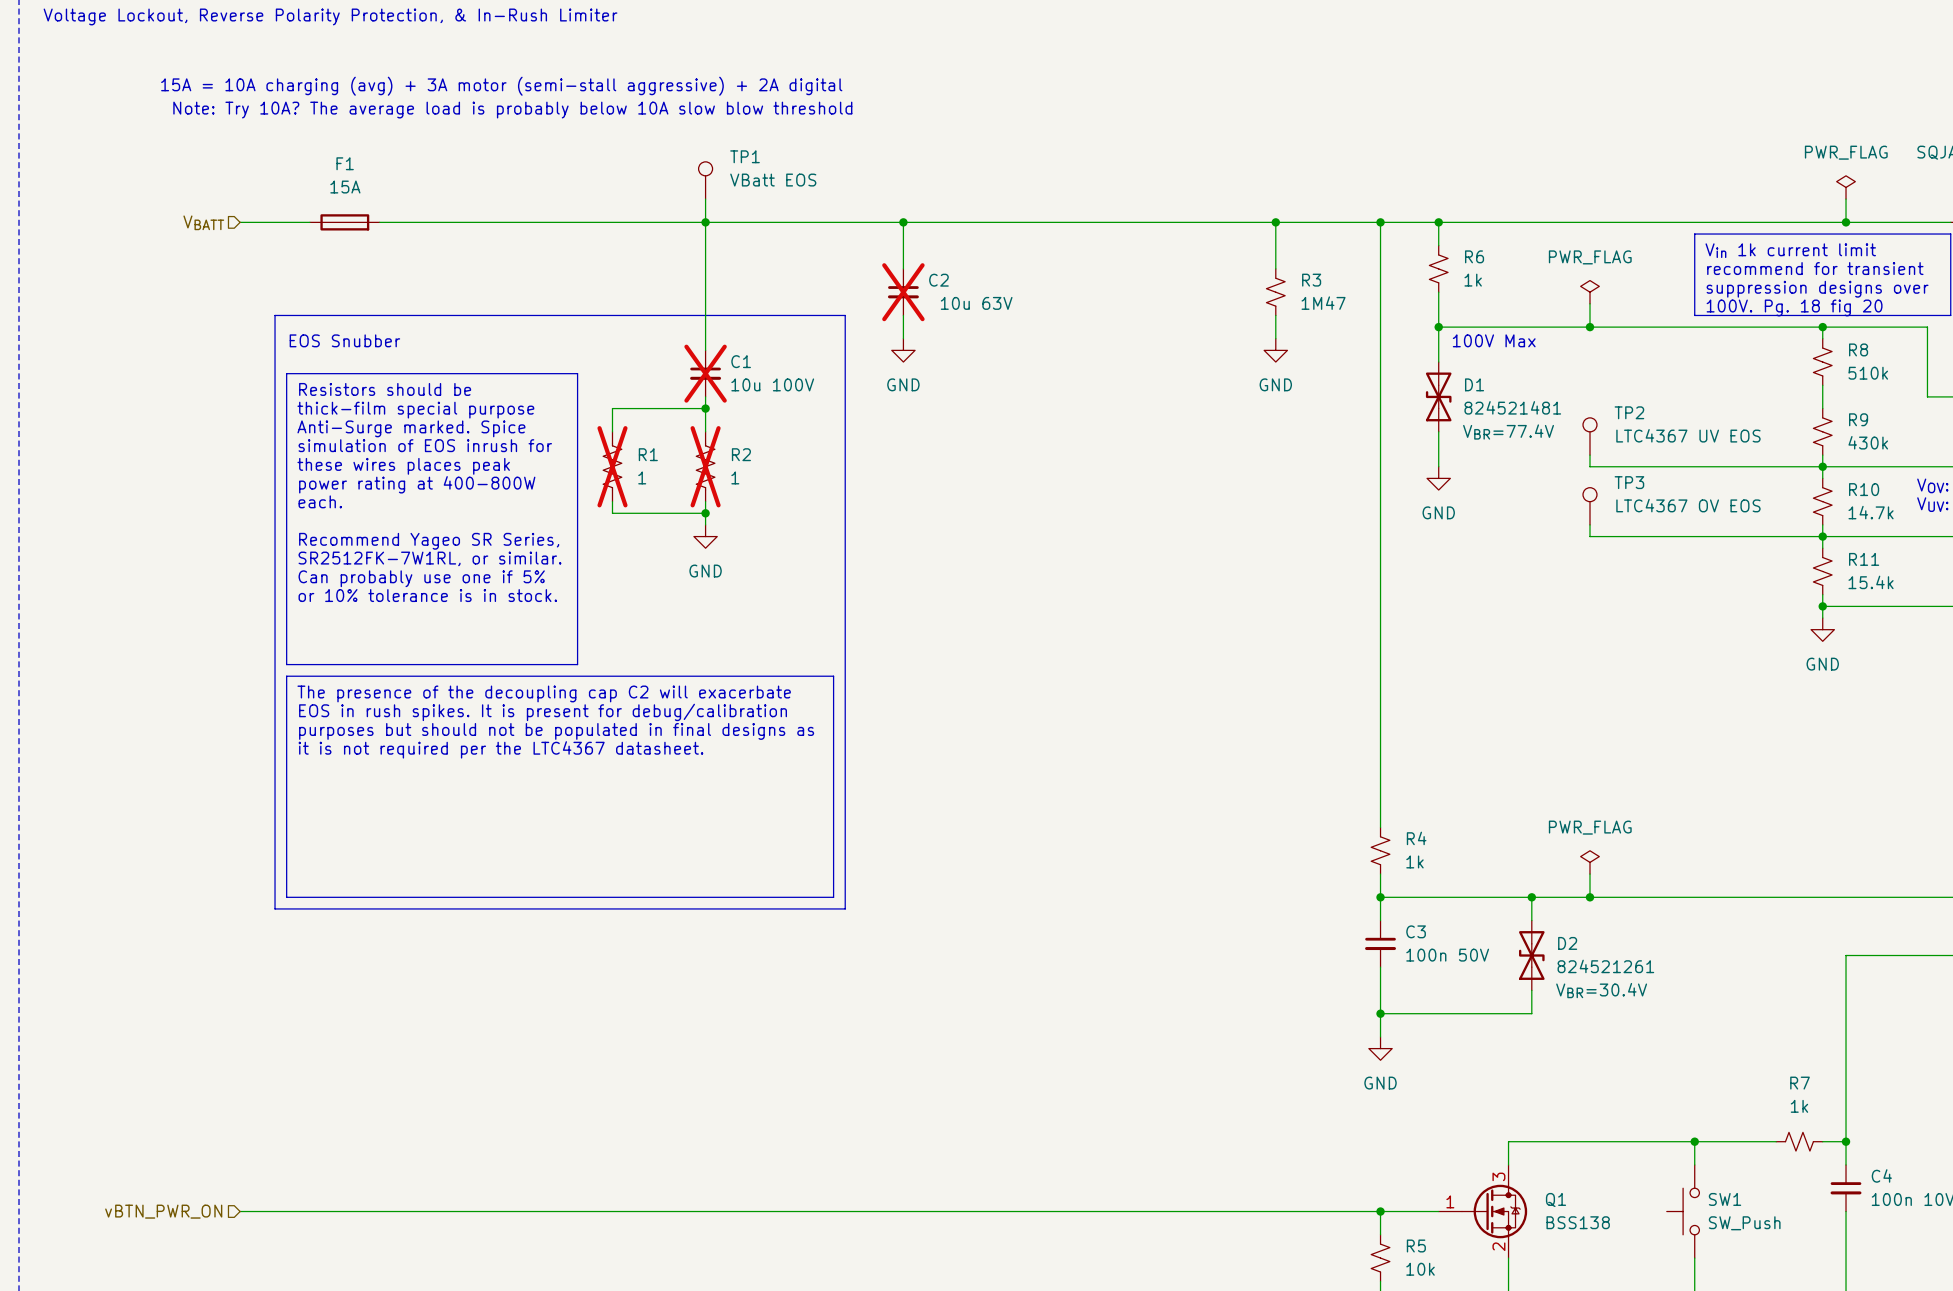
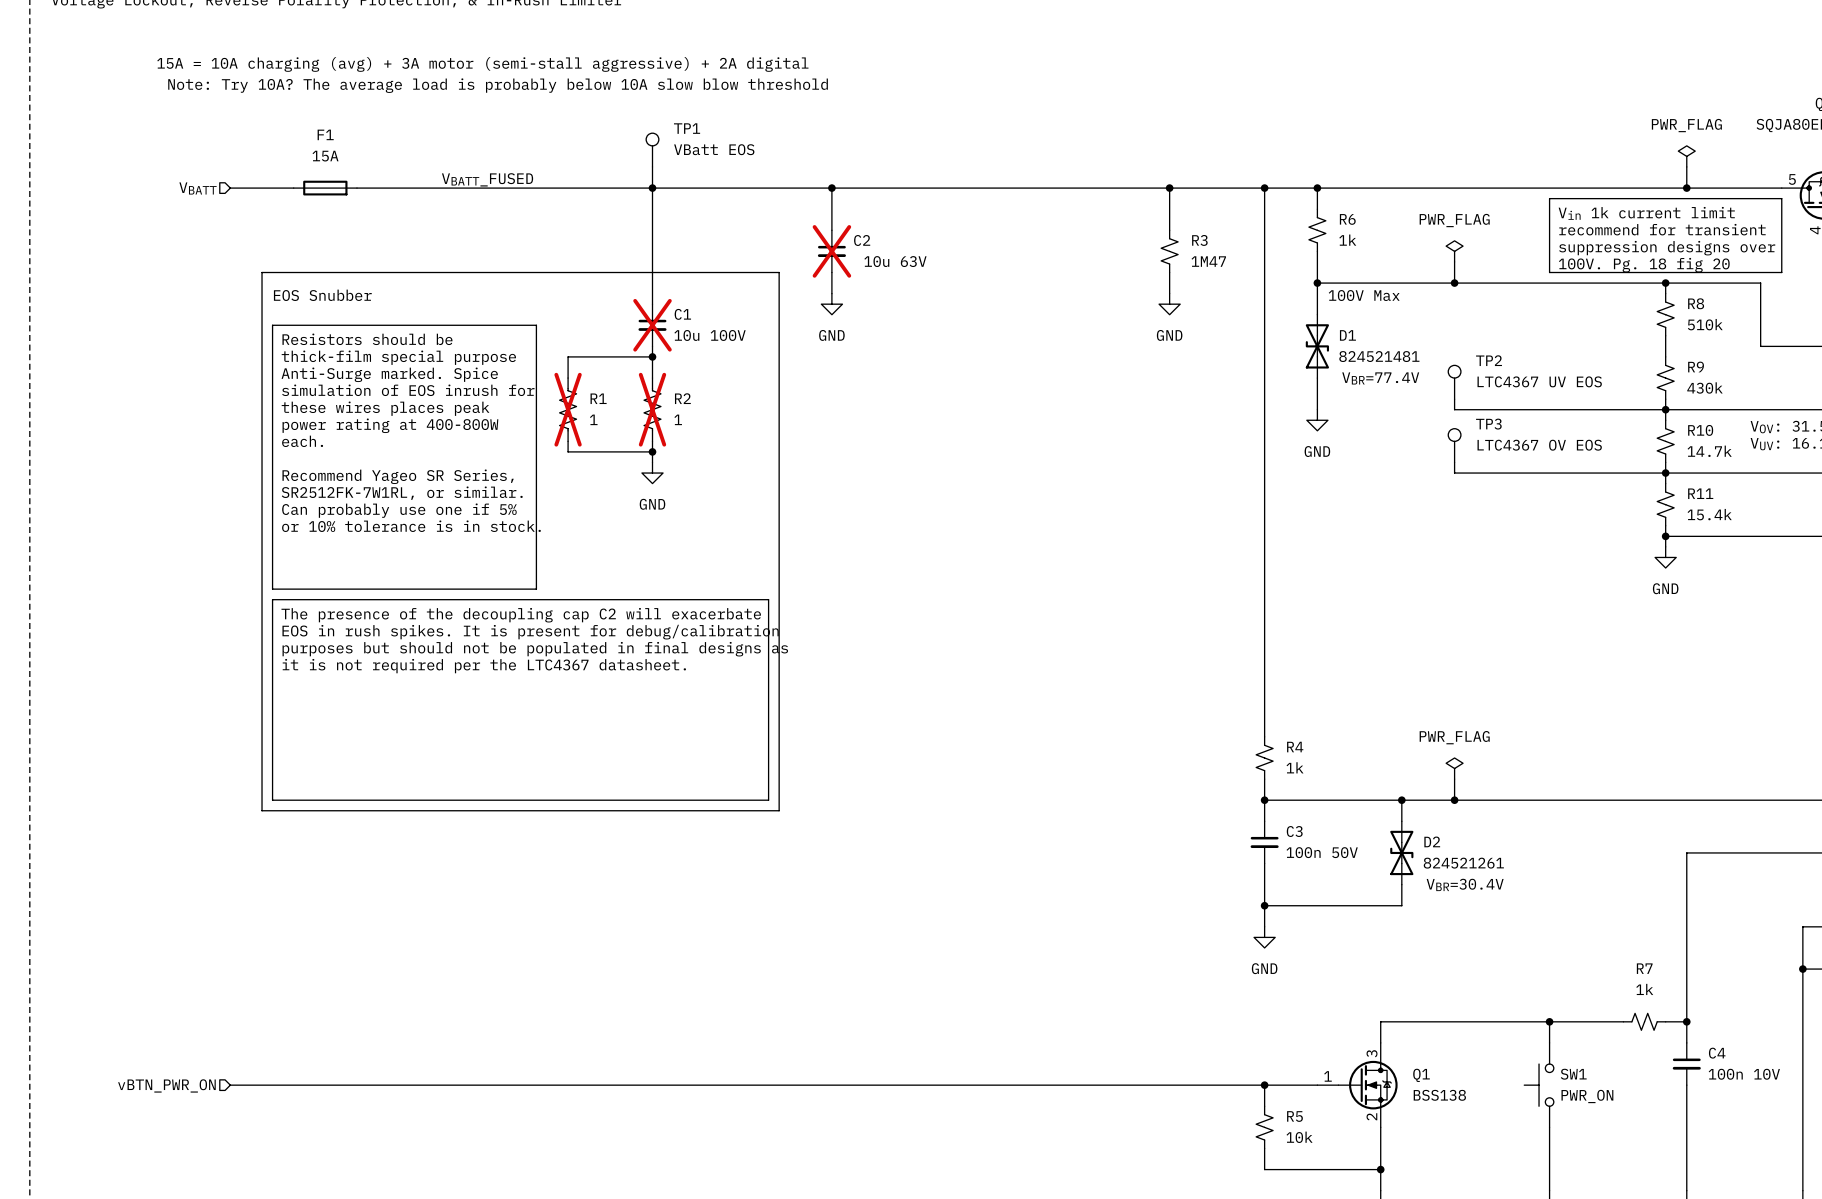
label: none -> VBATT_FUSED (487, 179)
SW1 value: SW_Push (1744, 1223) -> PWR_ON (1587, 1096)

